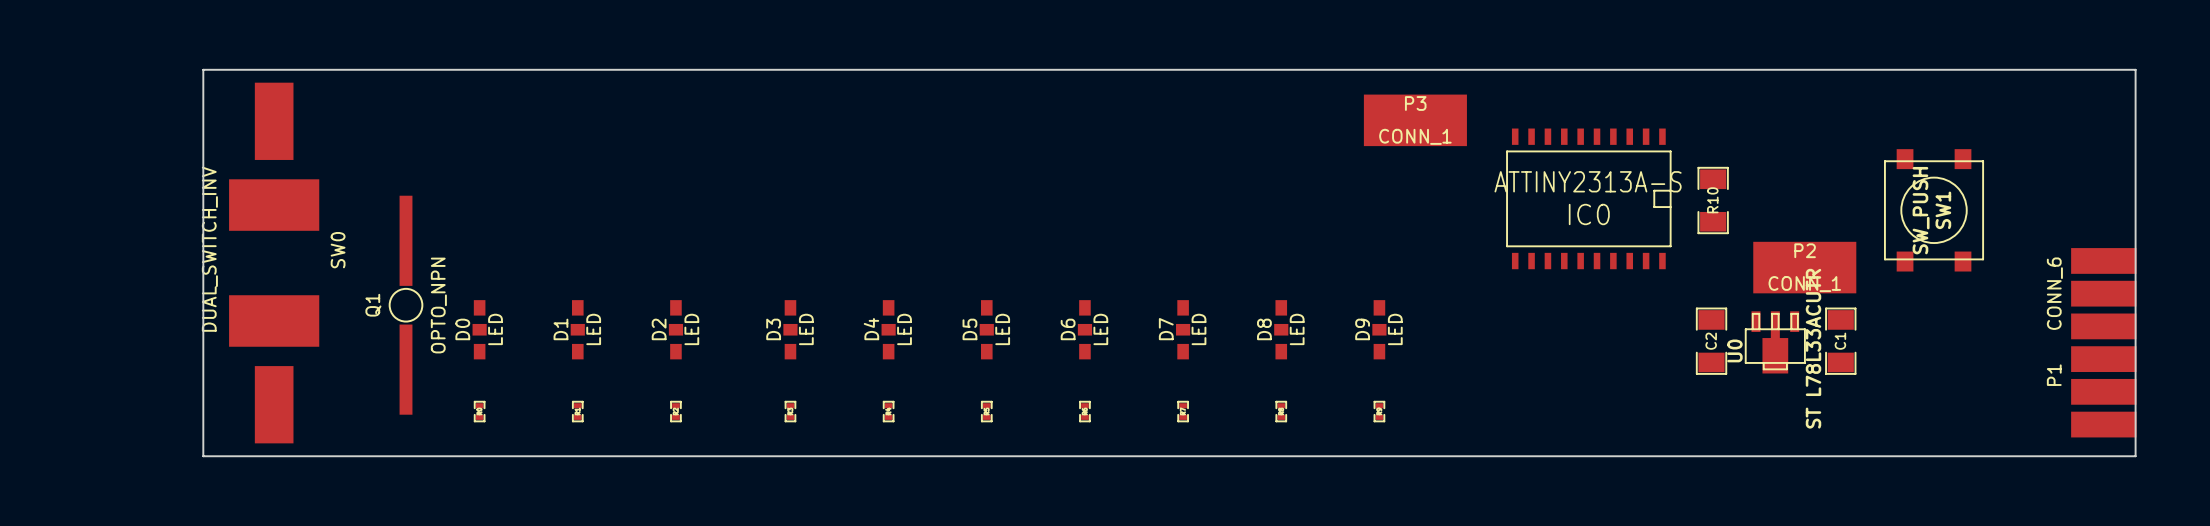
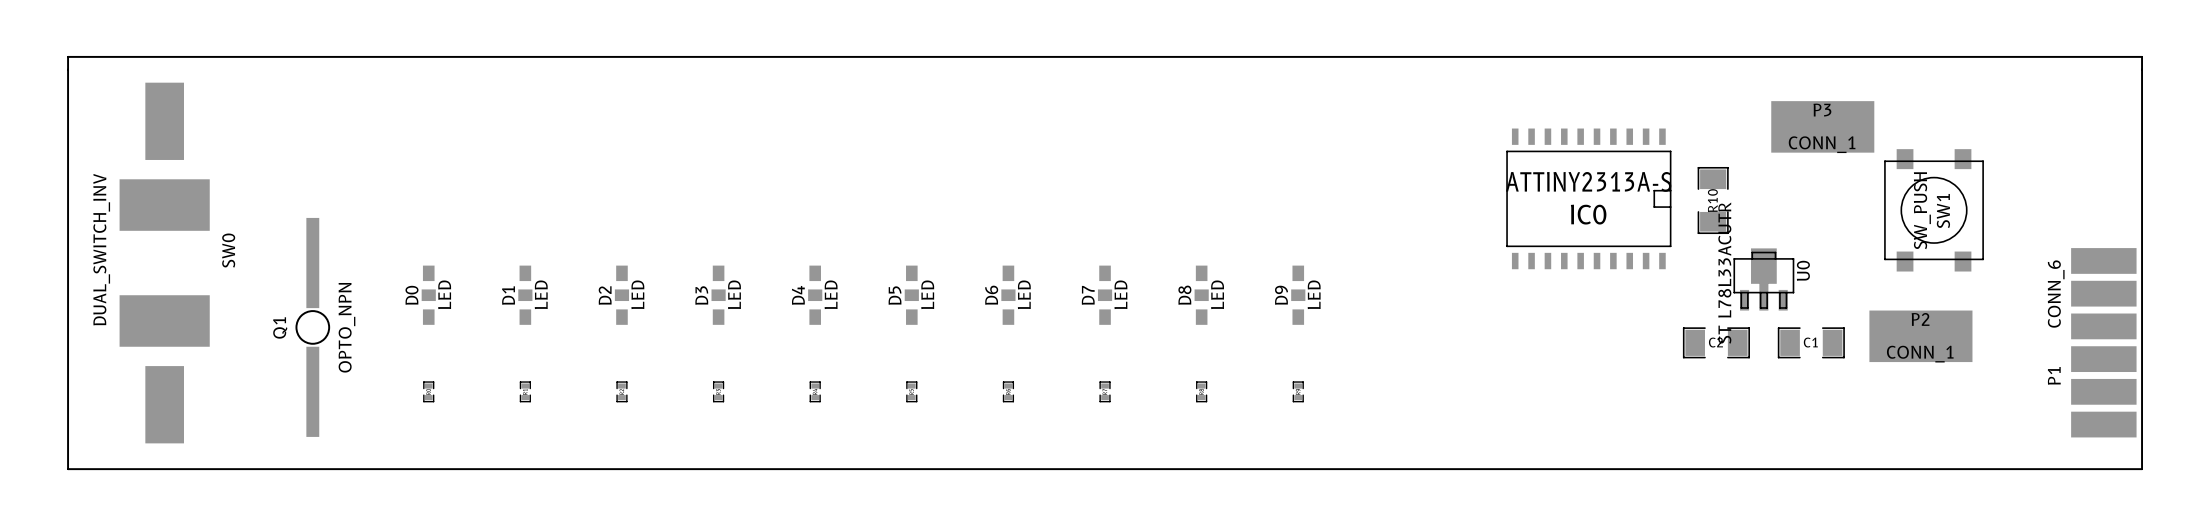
board edge: (203, 69) (203, 456) (2135, 456) (2135, 69) (203, 69) -> (68, 56) (68, 469) (2142, 469) (2142, 56) (68, 56)
P3 position: (1415, 120) -> (1822, 126)
SW0 position: (274, 263) -> (164, 263)
P2 position: (1804, 267) -> (1920, 336)
Q1 position: (406, 305) -> (312, 327)
D0 position: (479, 329) -> (428, 295)
D1 position: (577, 329) -> (525, 295)
D2 position: (675, 329) -> (621, 295)
D3 position: (790, 329) -> (718, 295)
D4 position: (888, 329) -> (815, 295)
D5 position: (986, 329) -> (911, 295)
D6 position: (1084, 329) -> (1008, 295)
D7 position: (1183, 329) -> (1105, 295)
D8 position: (1281, 329) -> (1201, 295)
D9 position: (1379, 329) -> (1298, 295)
C2 rotation: 0° (1711, 341) -> 90° clockwise (1716, 342)
C1 rotation: 0° (1840, 341) -> 90° clockwise (1811, 342)
U0 rotation: 0° (1775, 342) -> 180° (1763, 279)
U0 position: (1775, 342) -> (1763, 279)
part position: (479, 411) -> (428, 391)
part position: (577, 411) -> (525, 391)
part position: (675, 411) -> (621, 391)
part position: (790, 411) -> (718, 391)
part position: (888, 411) -> (815, 391)
part position: (986, 411) -> (911, 391)
part position: (1084, 411) -> (1008, 391)
part position: (1183, 411) -> (1105, 391)
part position: (1281, 411) -> (1201, 391)
part position: (1379, 411) -> (1298, 391)

